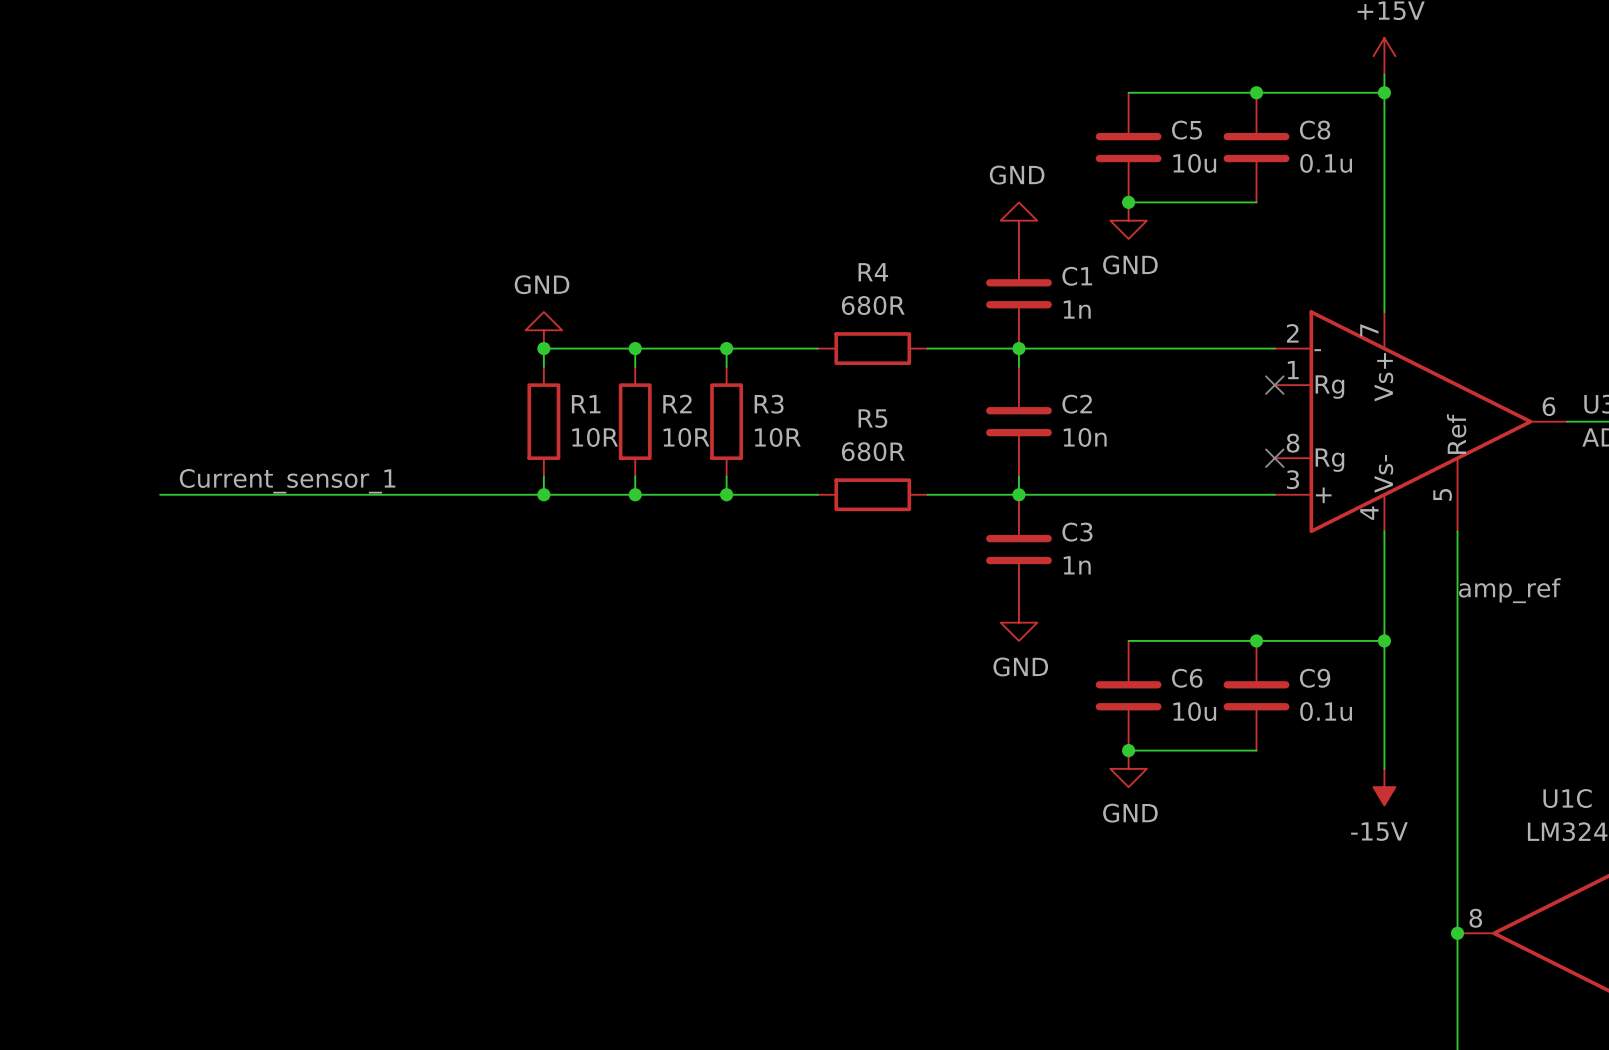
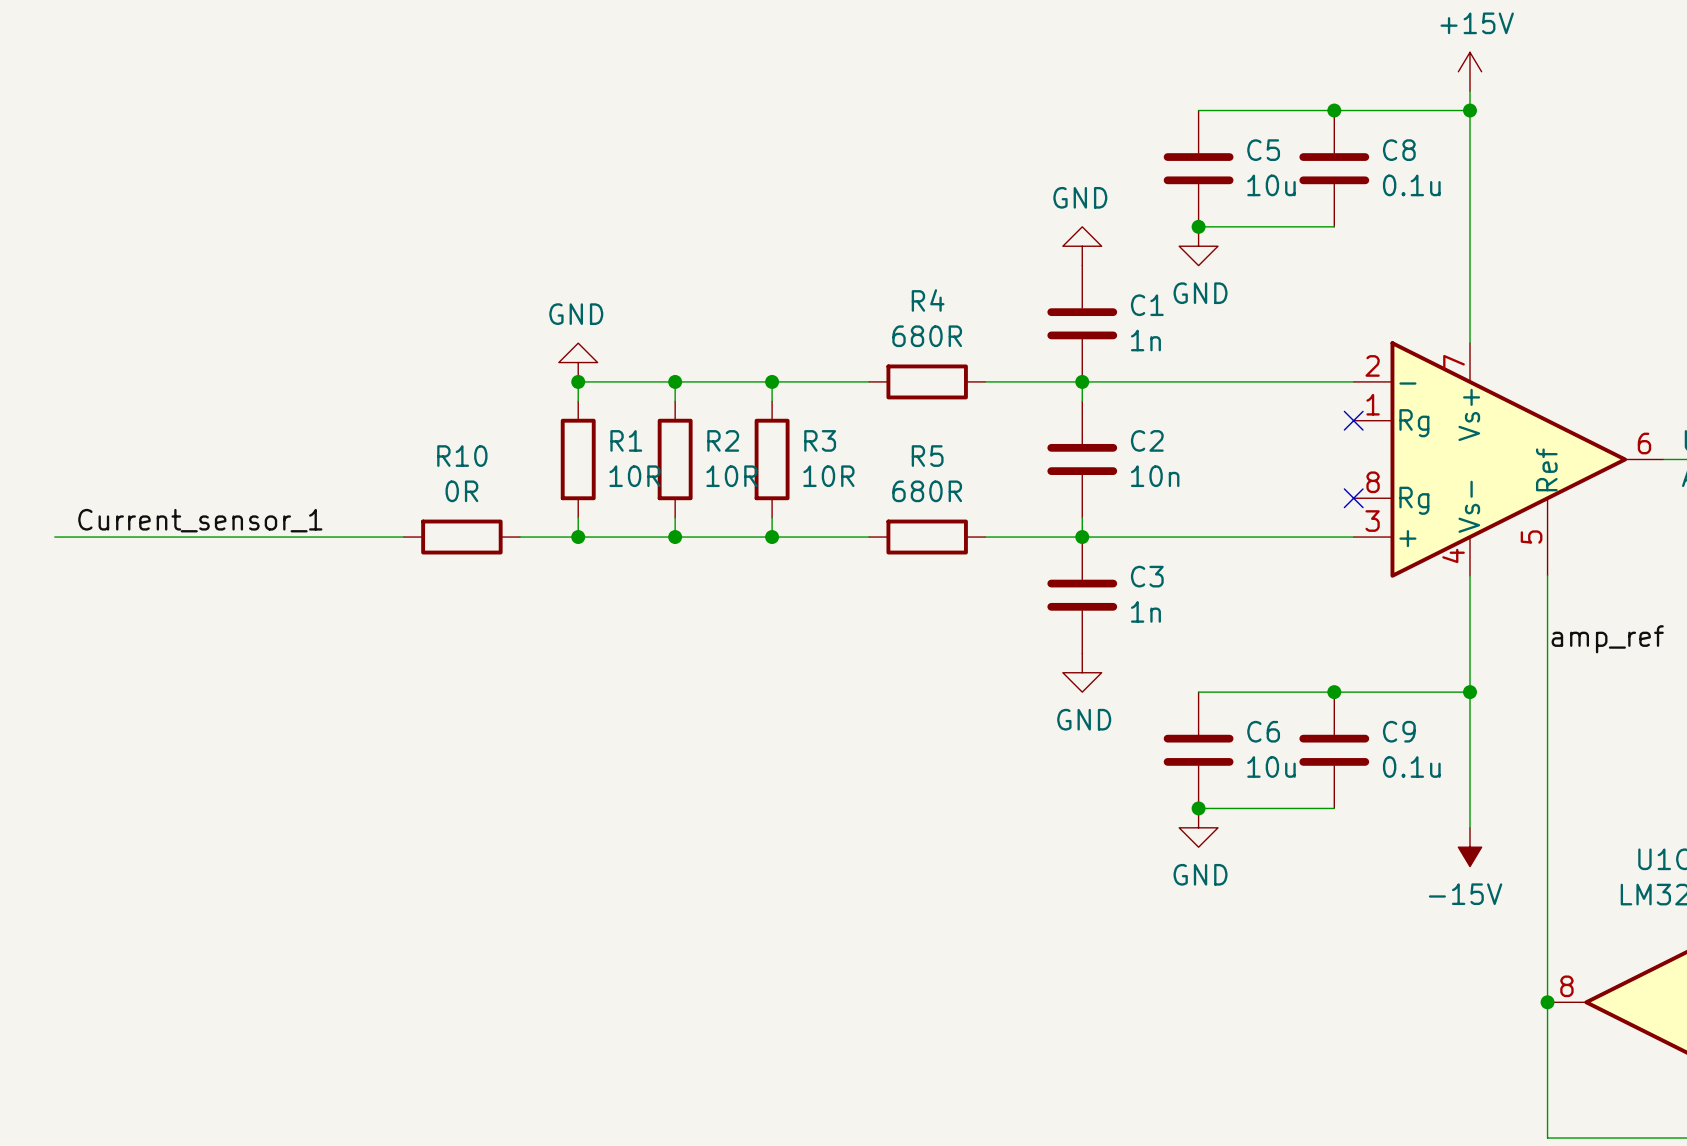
label position: Current_sensor_1 (287, 481) -> Current_sensor_1 (200, 520)
wire: (379, 494) (489, 494) -> (54, 537) (171, 537)
R10: none -> 0R (461, 537)

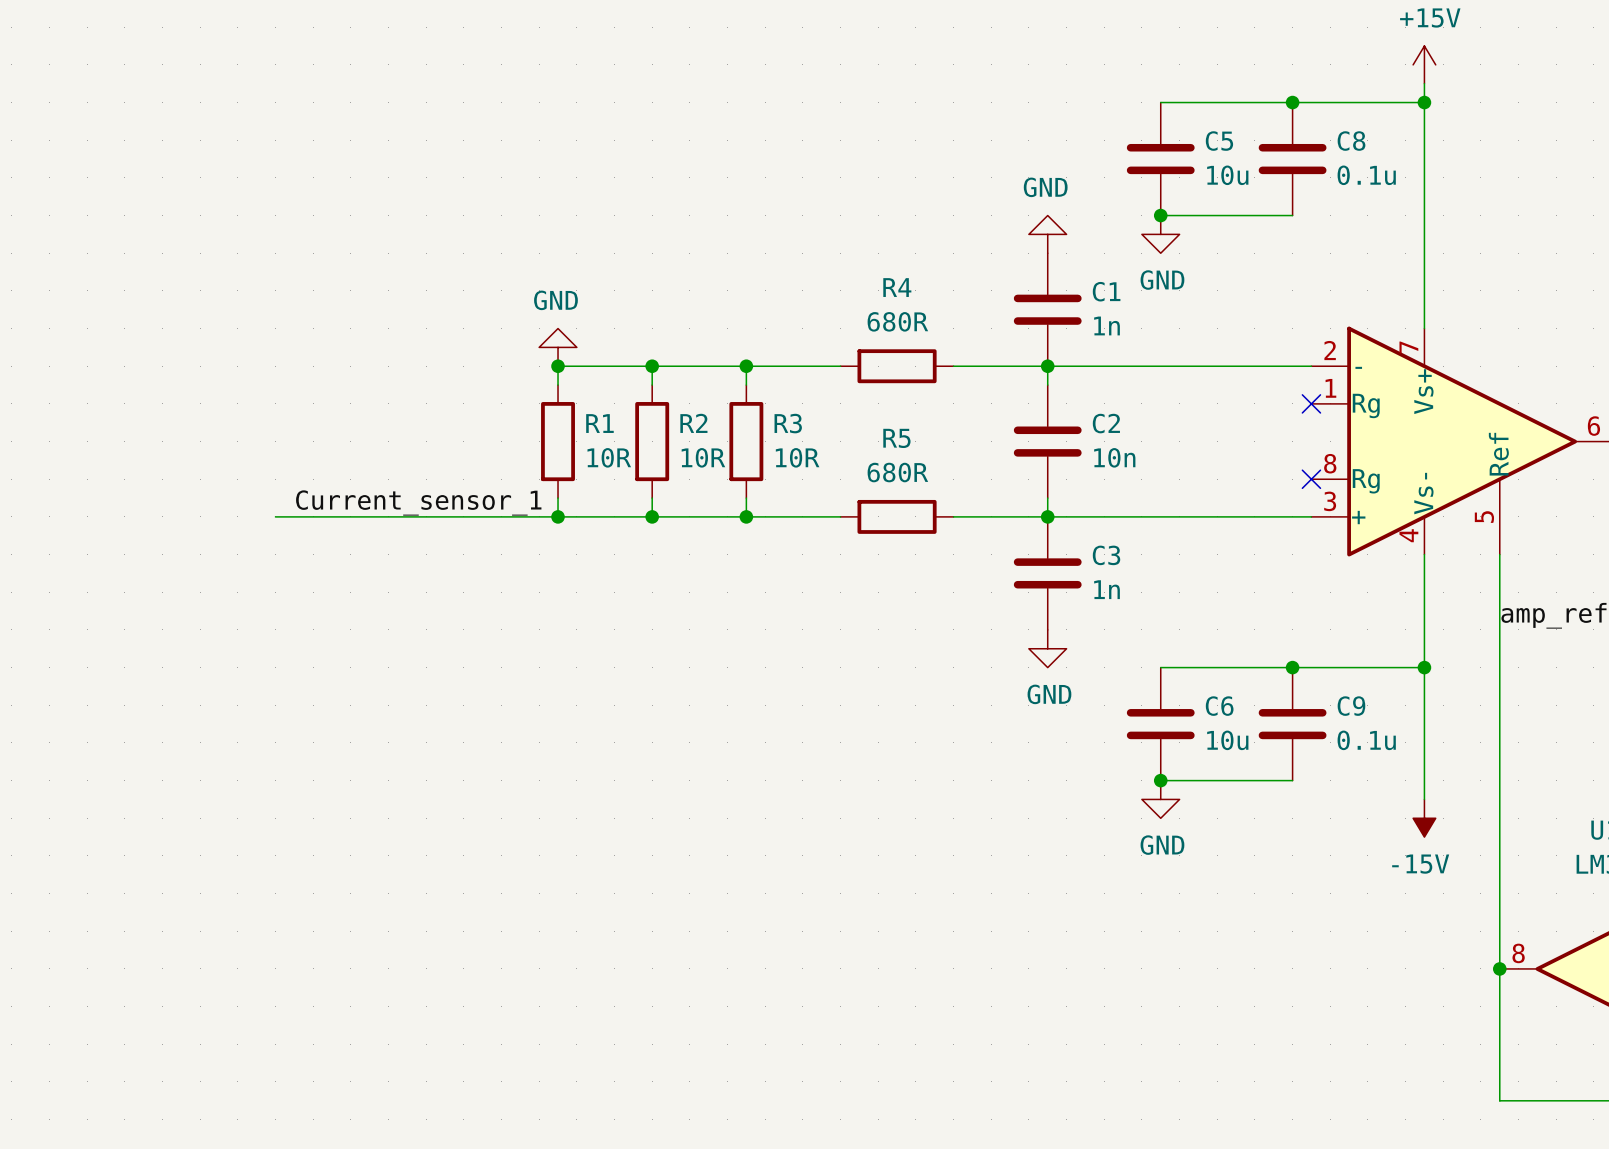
label position: Current_sensor_1 (200, 520) -> Current_sensor_1 (418, 502)
wire: (54, 537) (287, 537) -> none
wire: none -> (388, 516) (501, 516)
R10: 0R (461, 537) -> none

